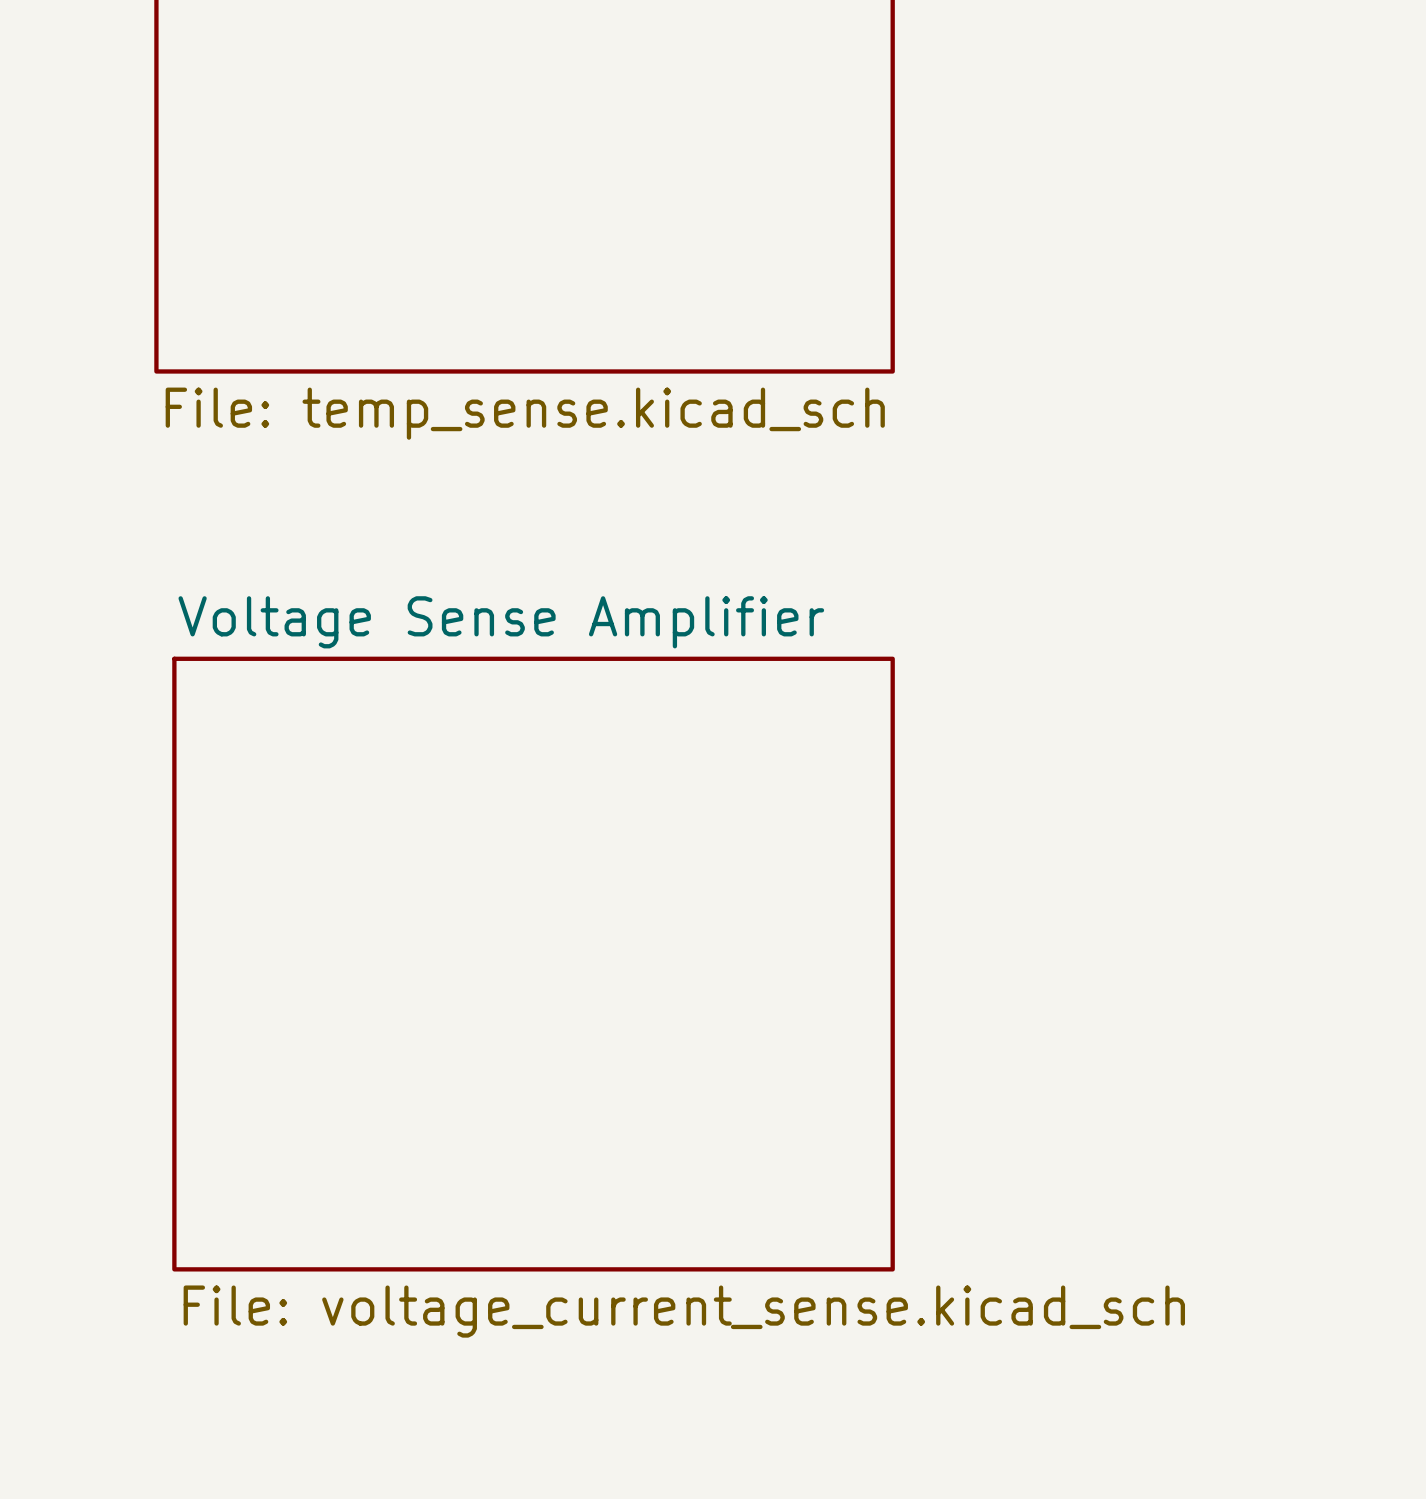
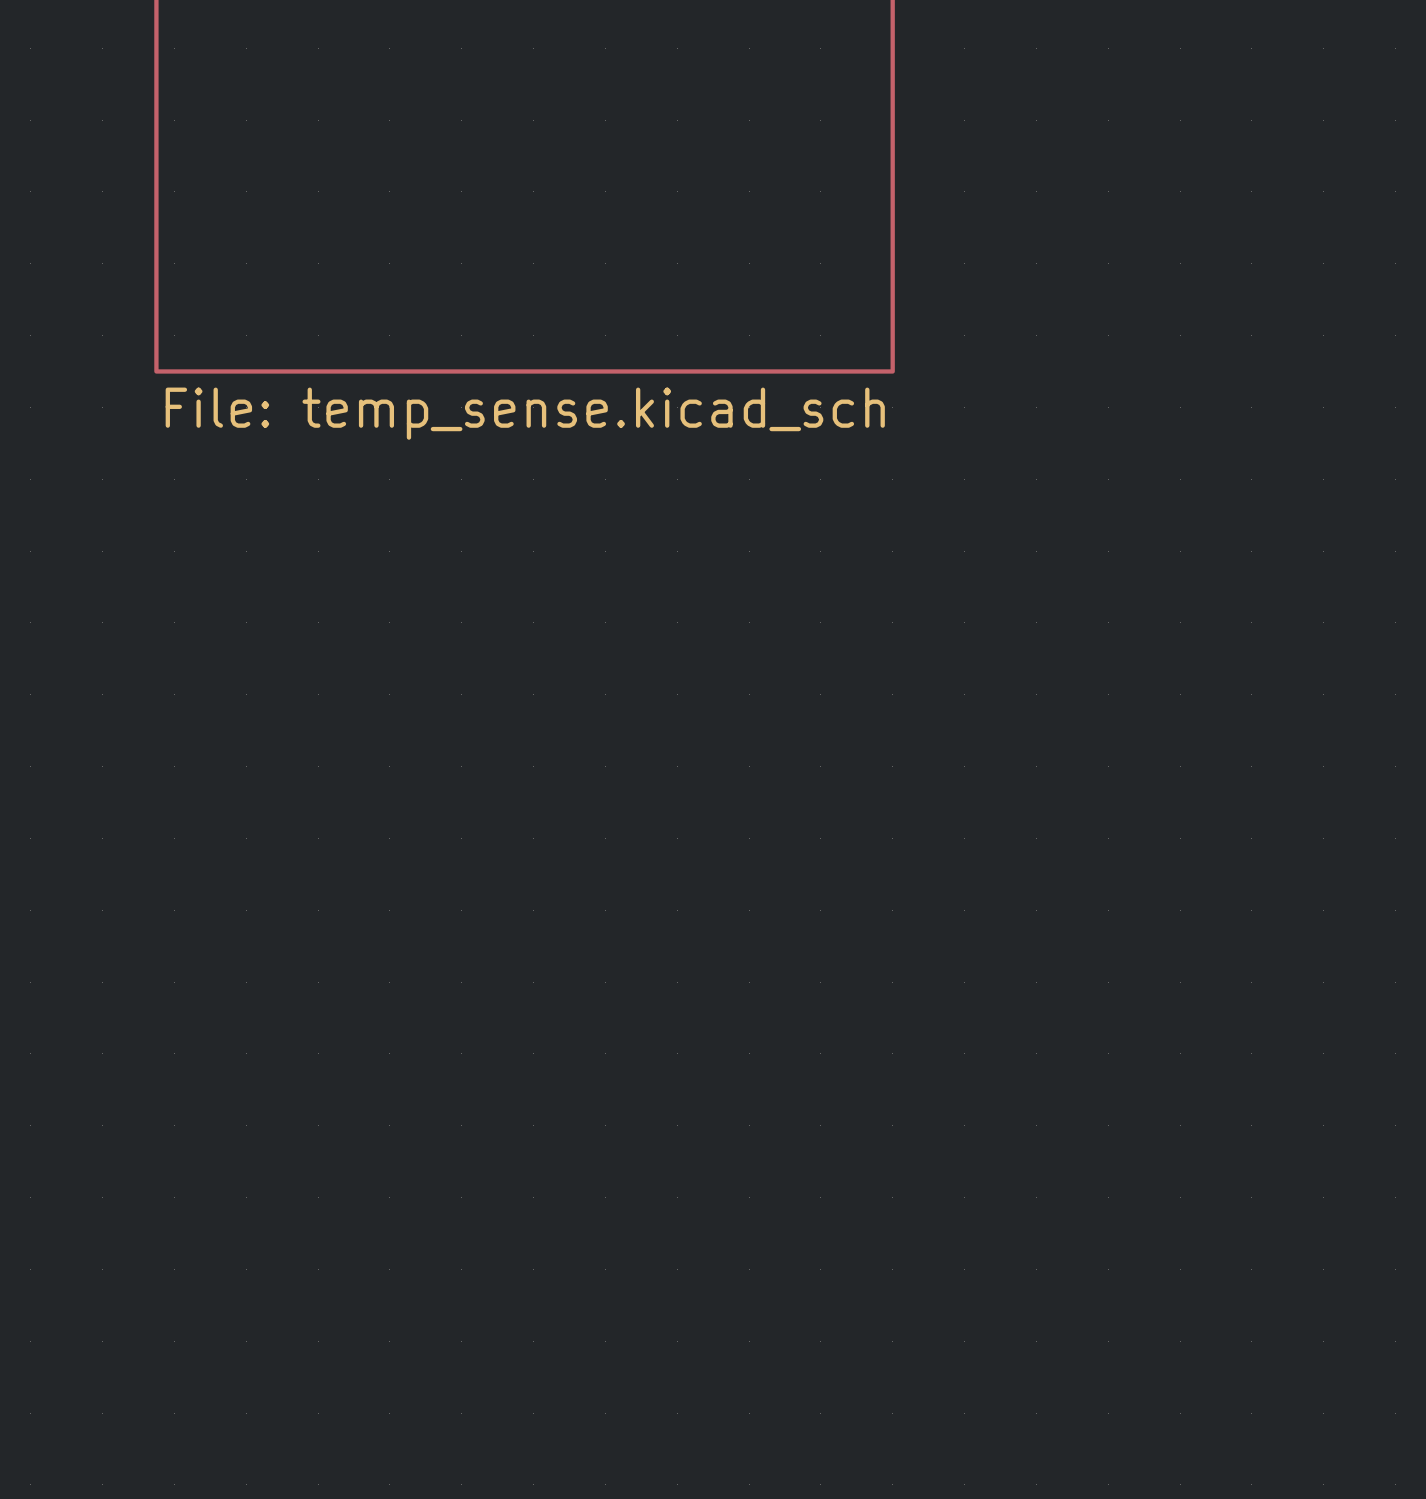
sheet Voltage Sense Amplifier: File: voltage_current_sense.kicad_sch (533, 964) -> none

